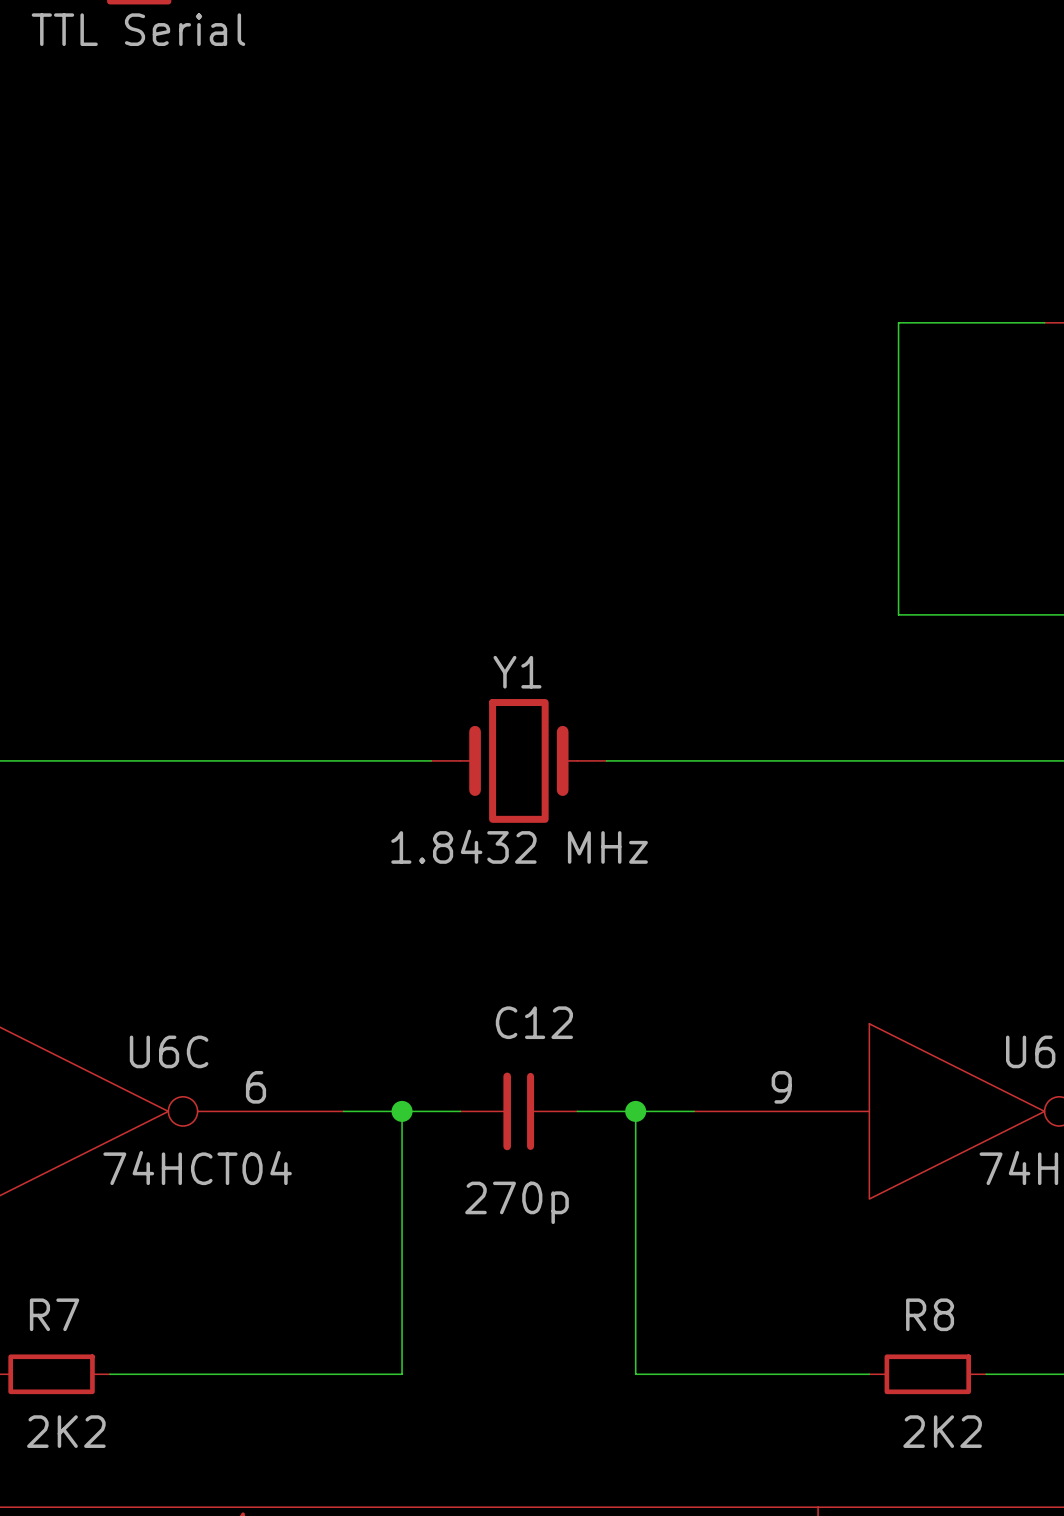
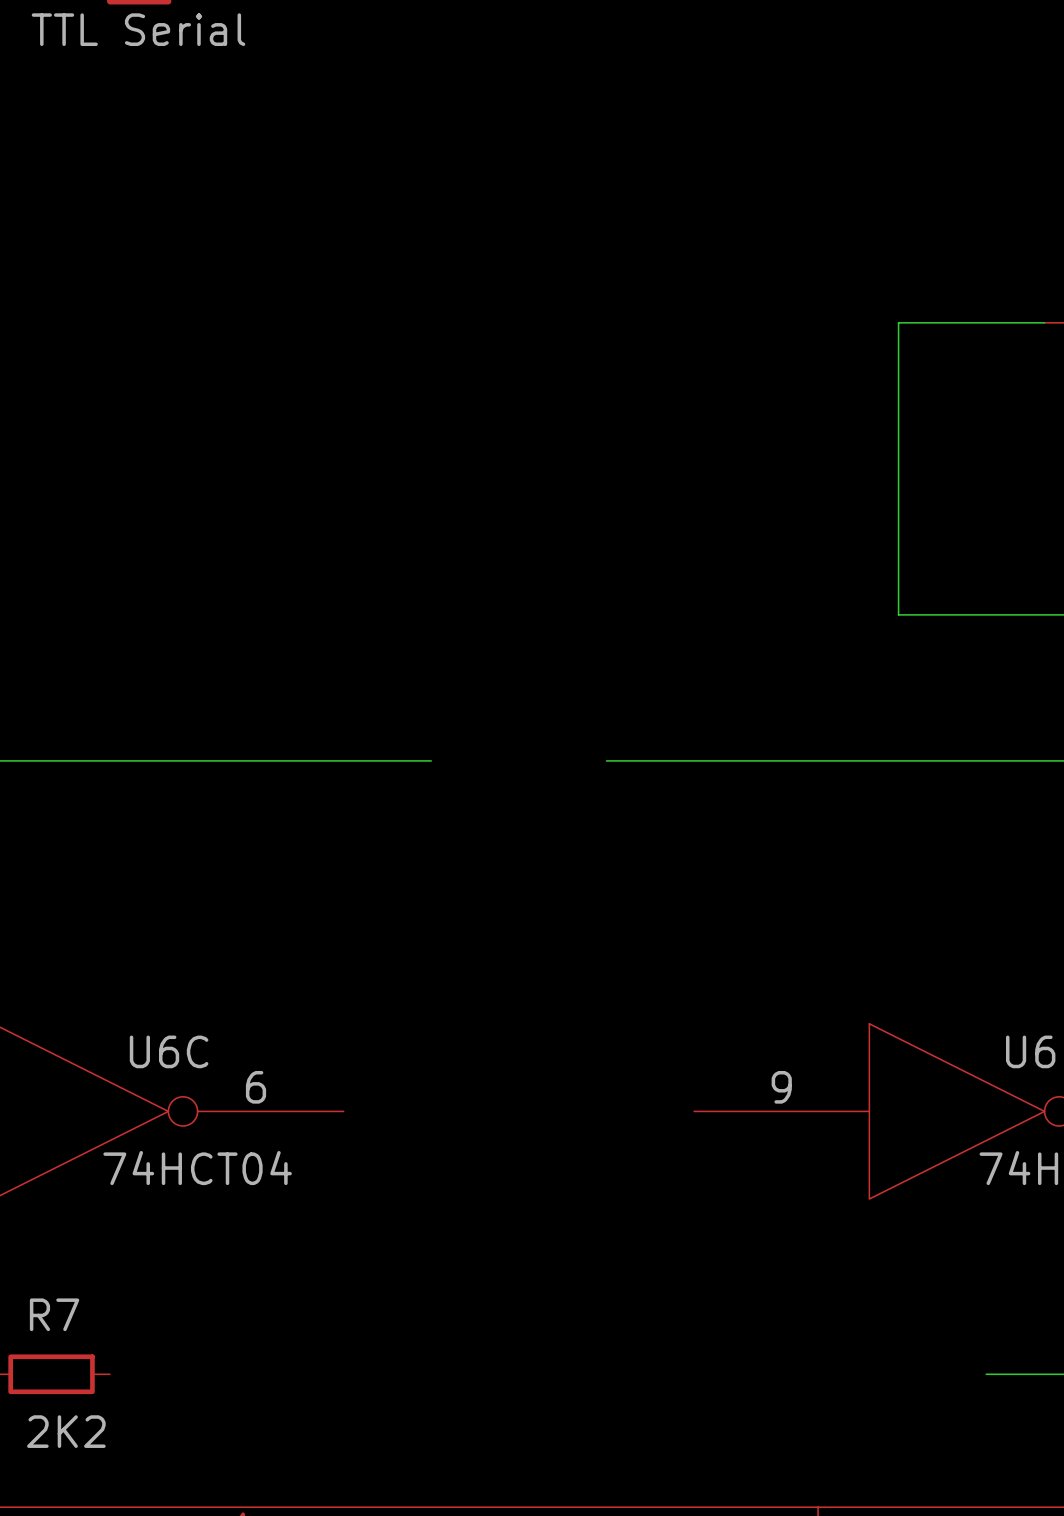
Y1: 1.8432 MHz (518, 760) -> none
wire: (343, 1111) (460, 1111) -> none
wire: (402, 1111) (402, 1374) (109, 1374) -> none
junction: (402, 1111) -> none
C12: 270p (518, 1111) -> none
wire: (577, 1111) (694, 1111) -> none
wire: (635, 1111) (635, 1374) (869, 1374) -> none
junction: (635, 1111) -> none
R8: 2K2 (927, 1374) -> none

